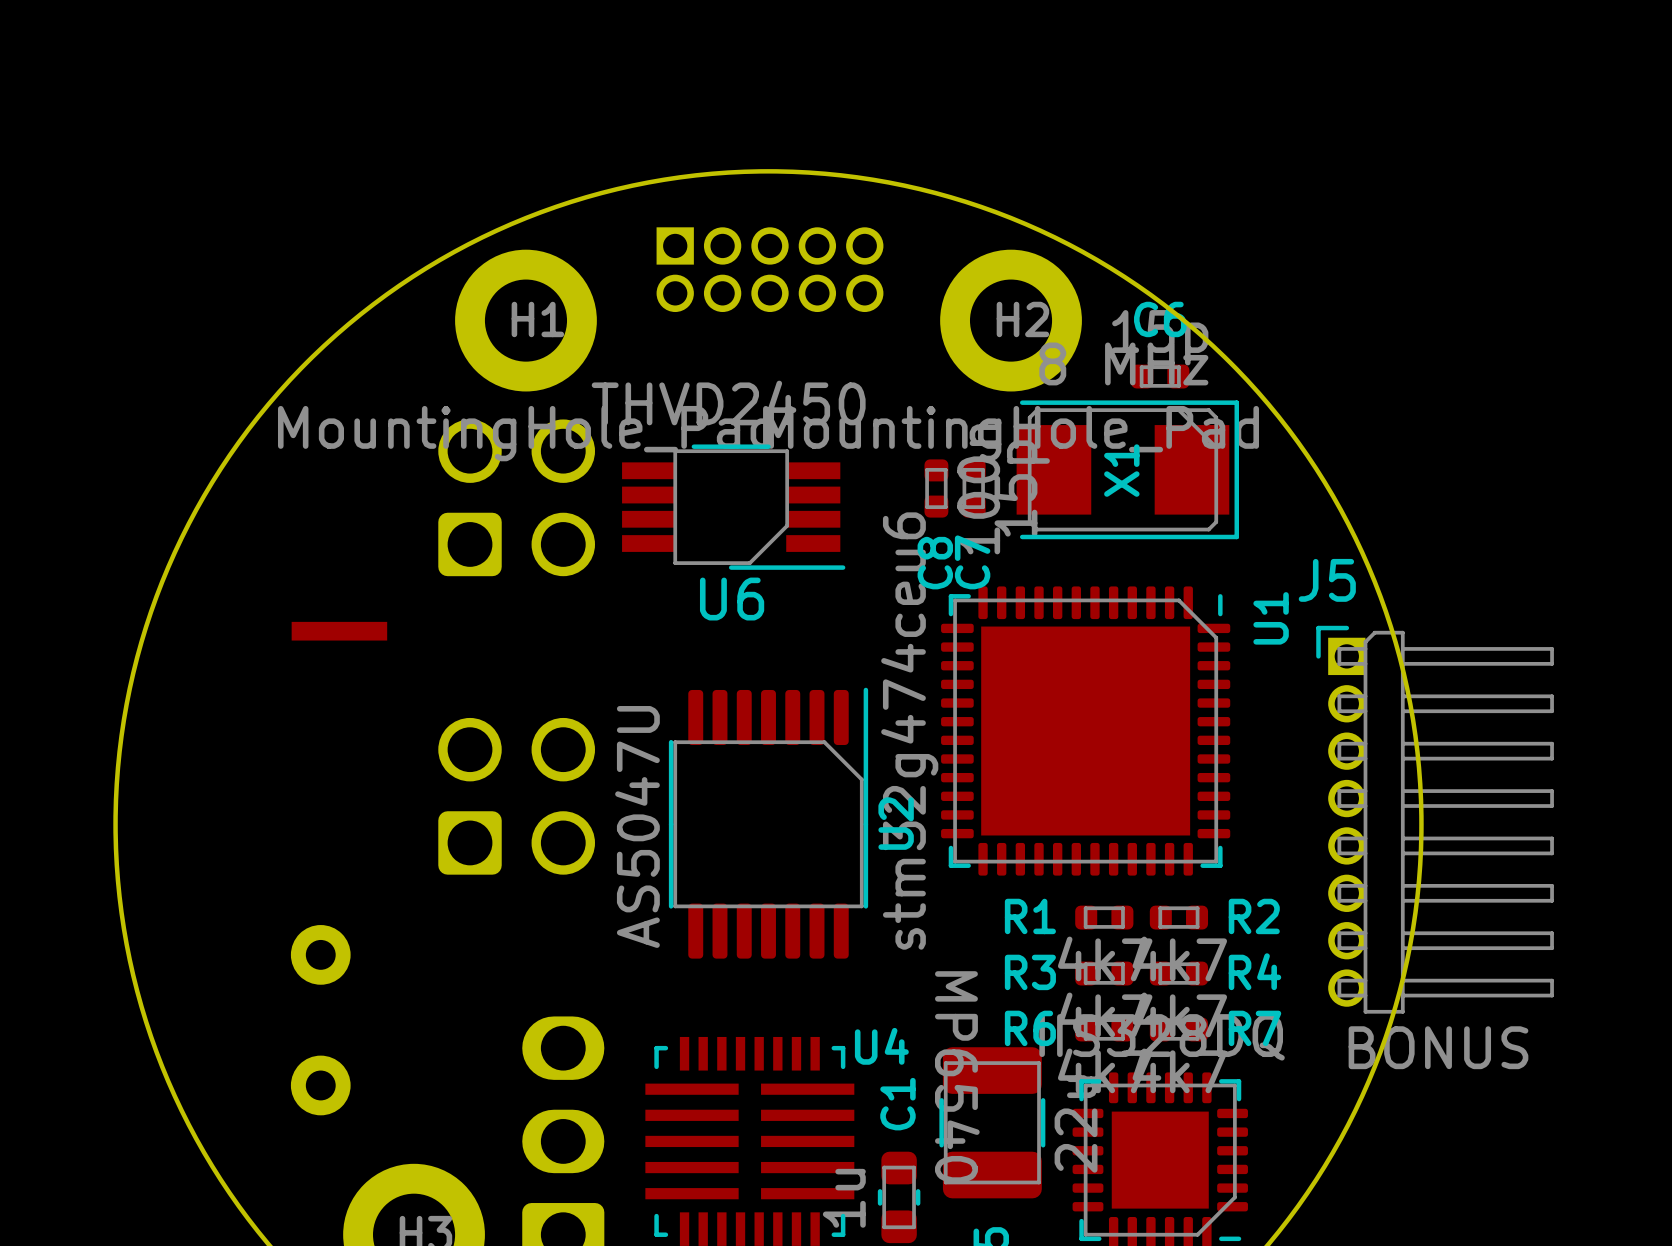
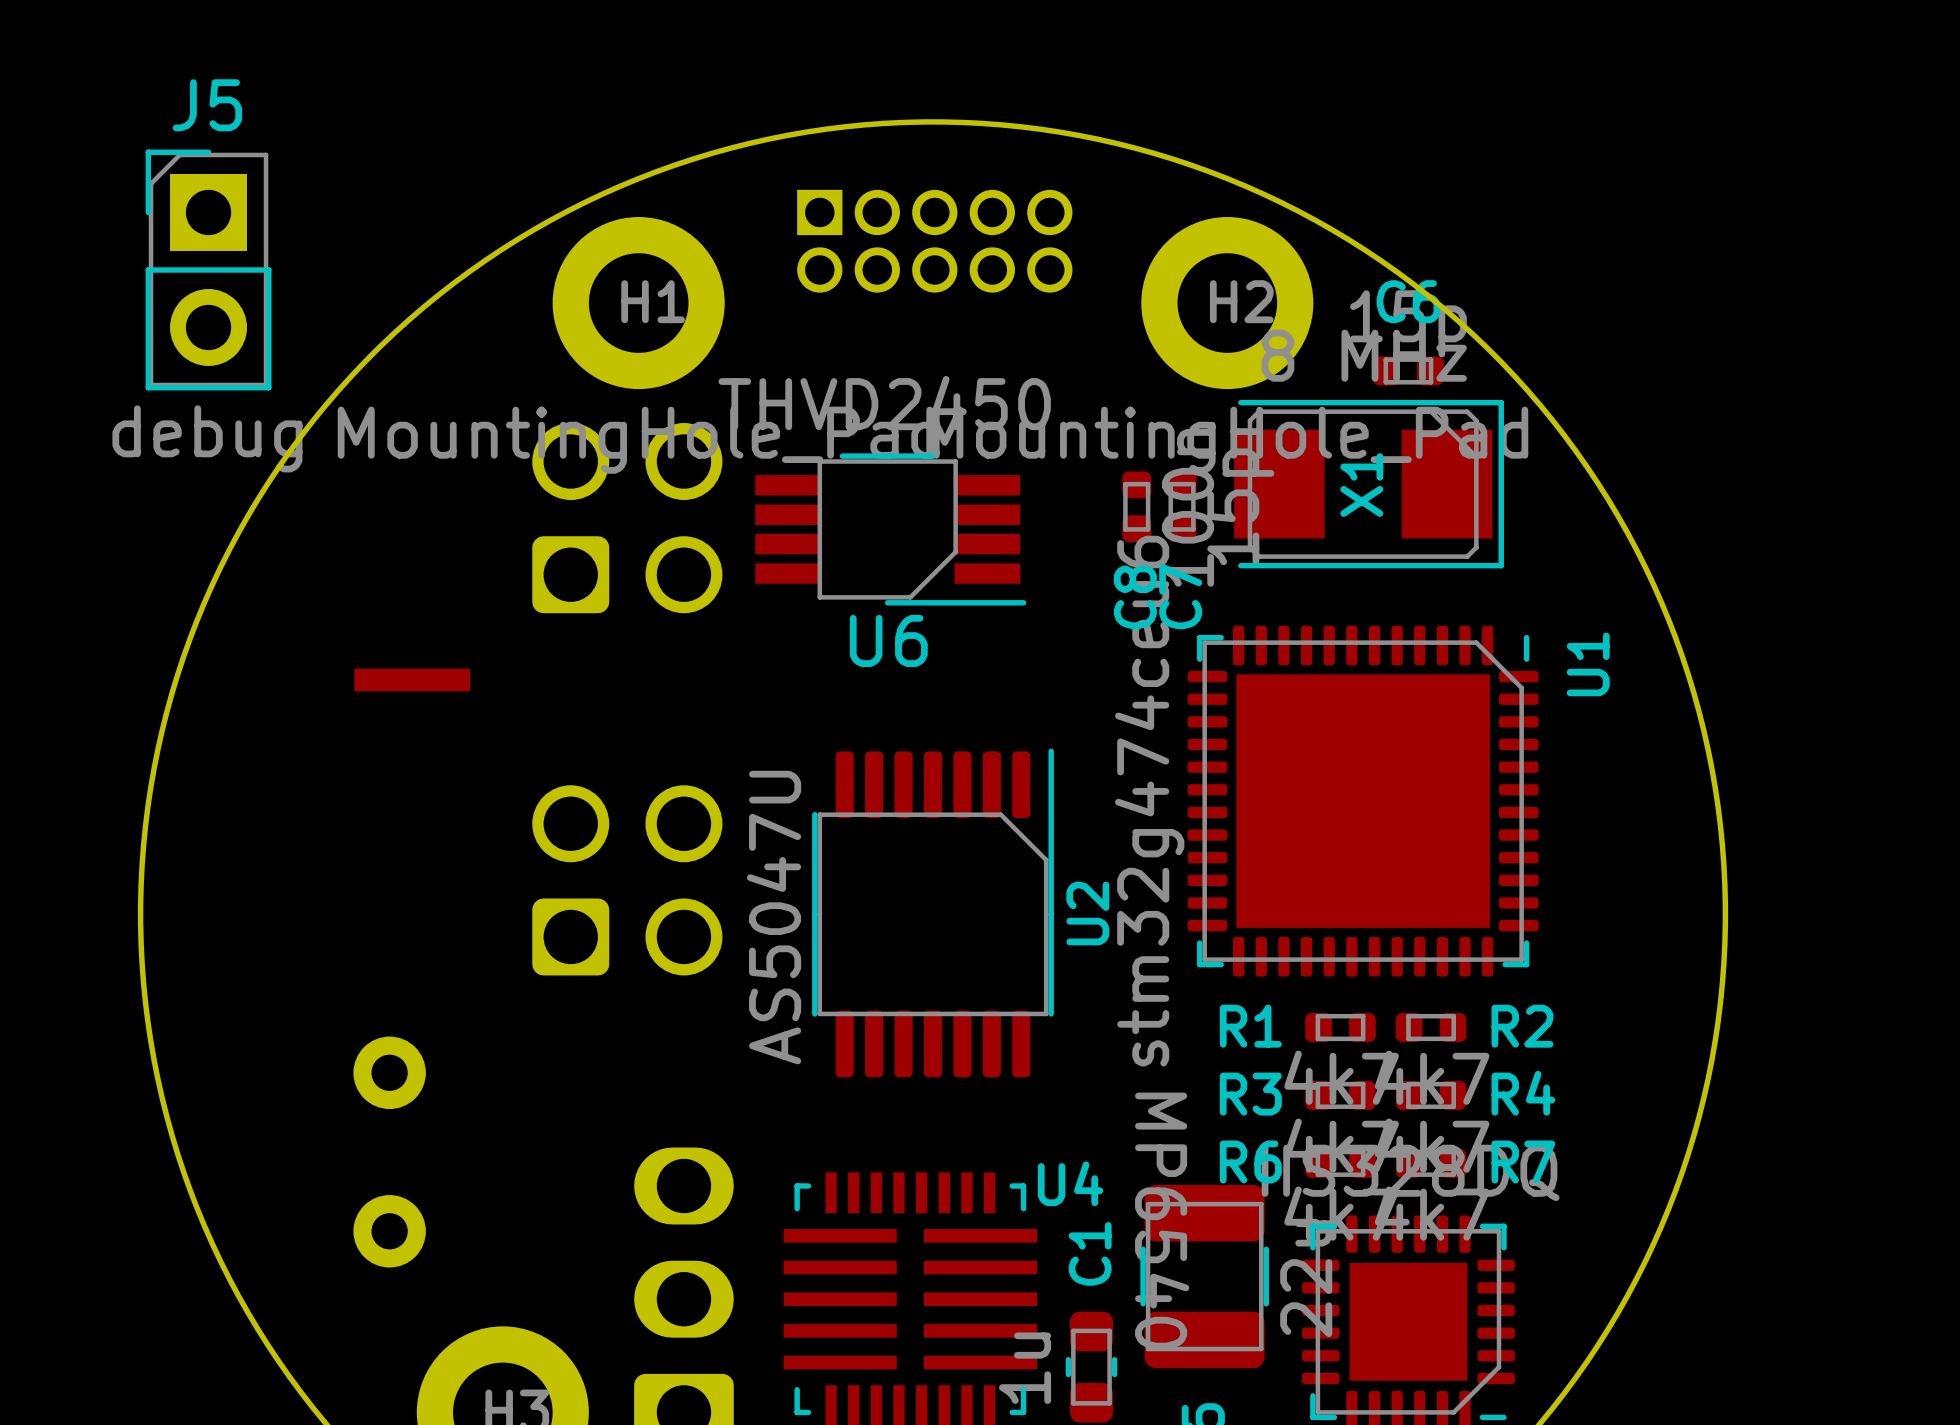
J5 name position: J5 (1327, 580) -> J5 (207, 105)
J5 footprint: [1316, 625, 1554, 1014] -> [145, 149, 272, 391]
U1 position: (1085, 731) -> (1363, 801)
J5 value: BONUS (1438, 1047) -> debug (207, 438)

